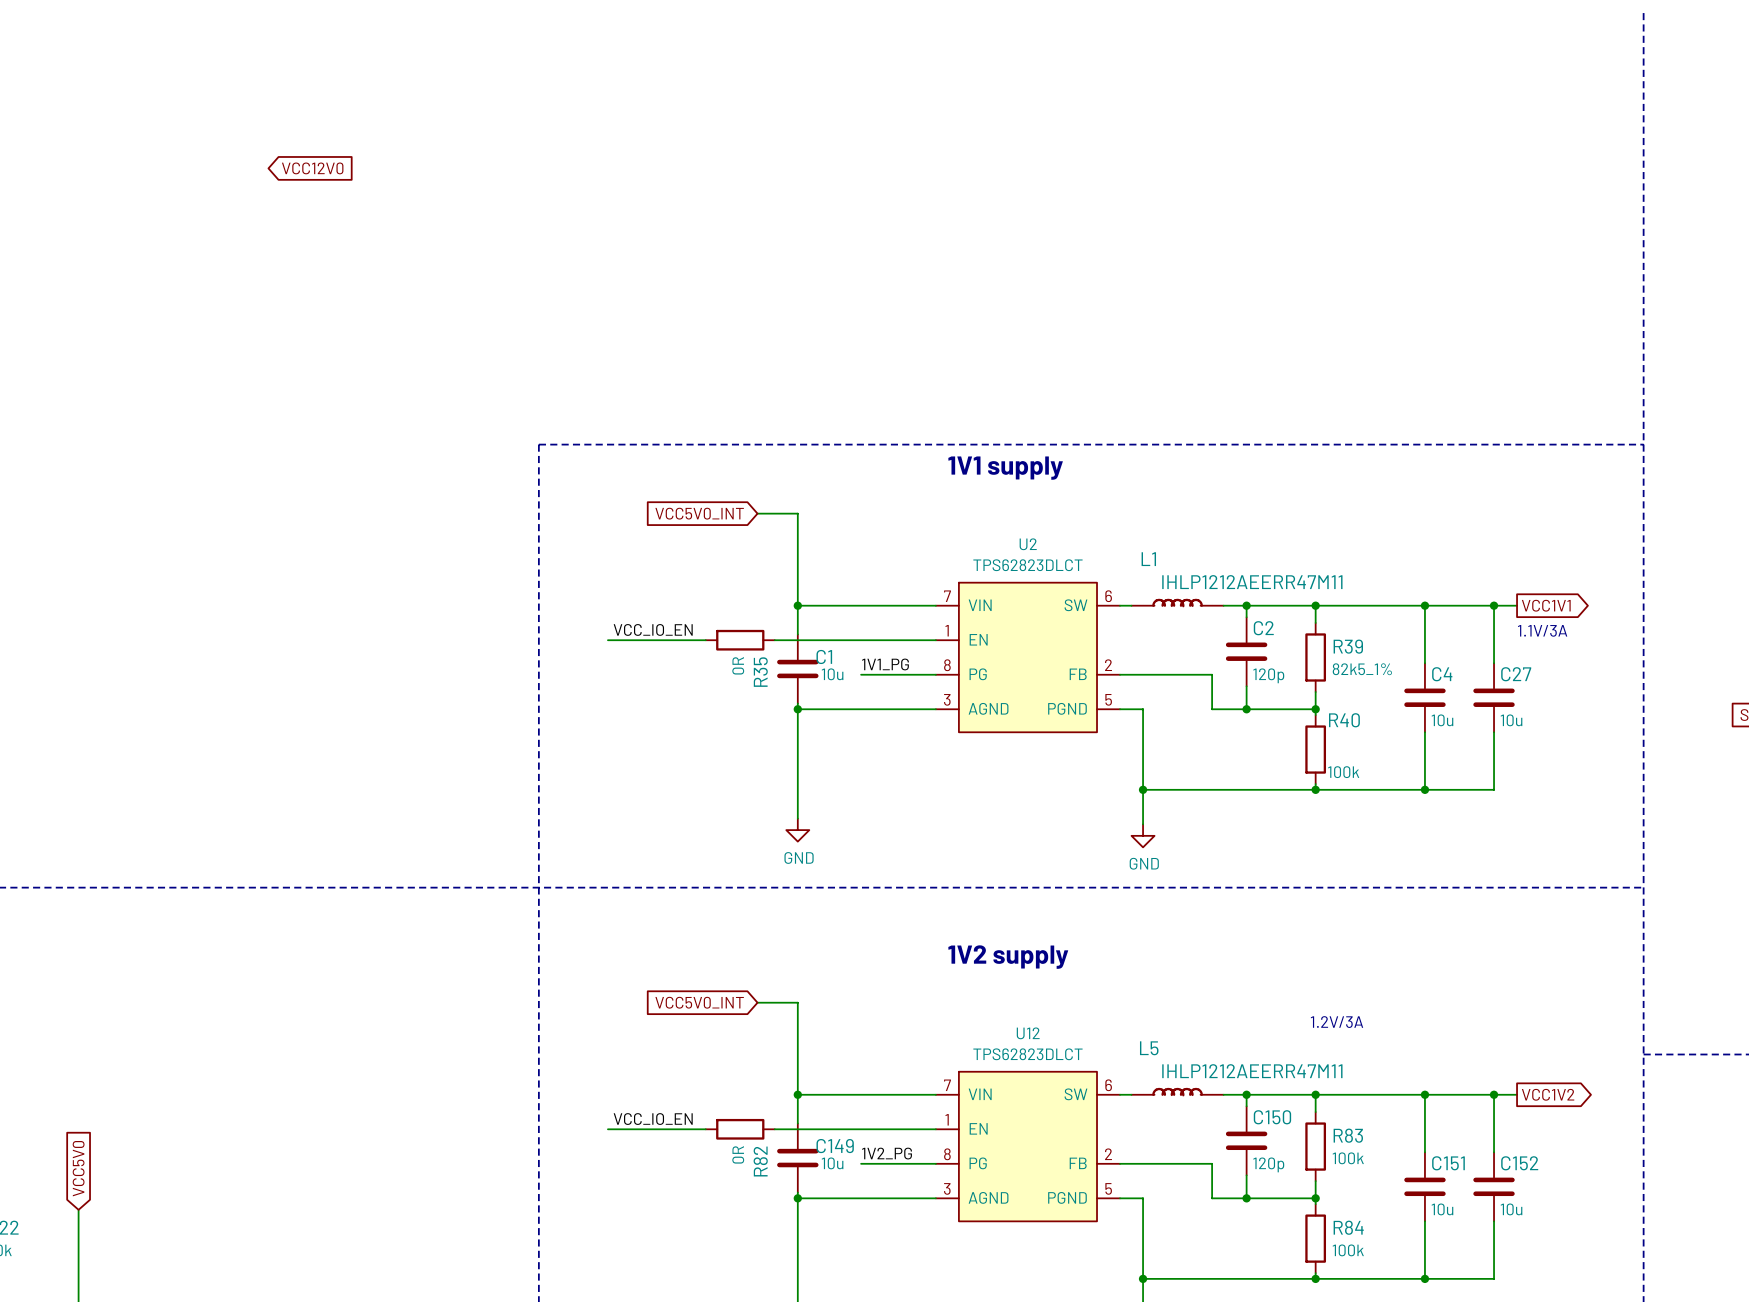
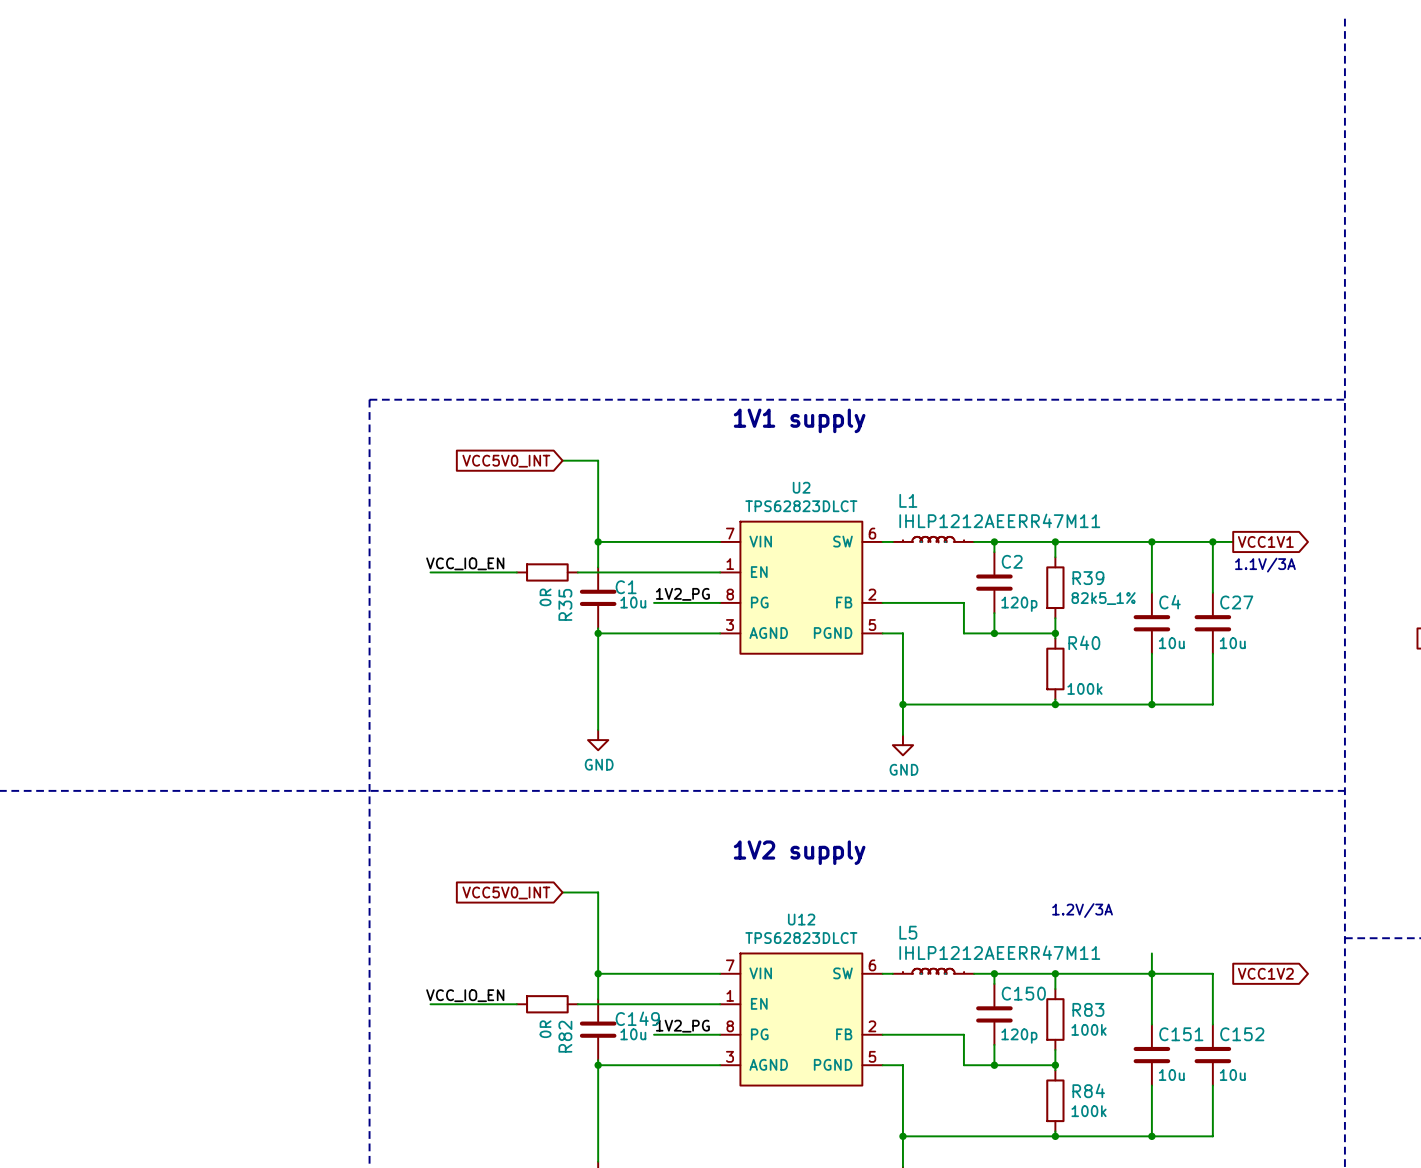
global label: VCC12V0 (312, 168) -> none
label: 1V1_PG (885, 664) -> 1V2_PG (682, 594)
wire: none -> (1151, 953) (1151, 973)
wire: (1494, 1094) (1517, 1094) -> none
junction: (1494, 1094) -> none

